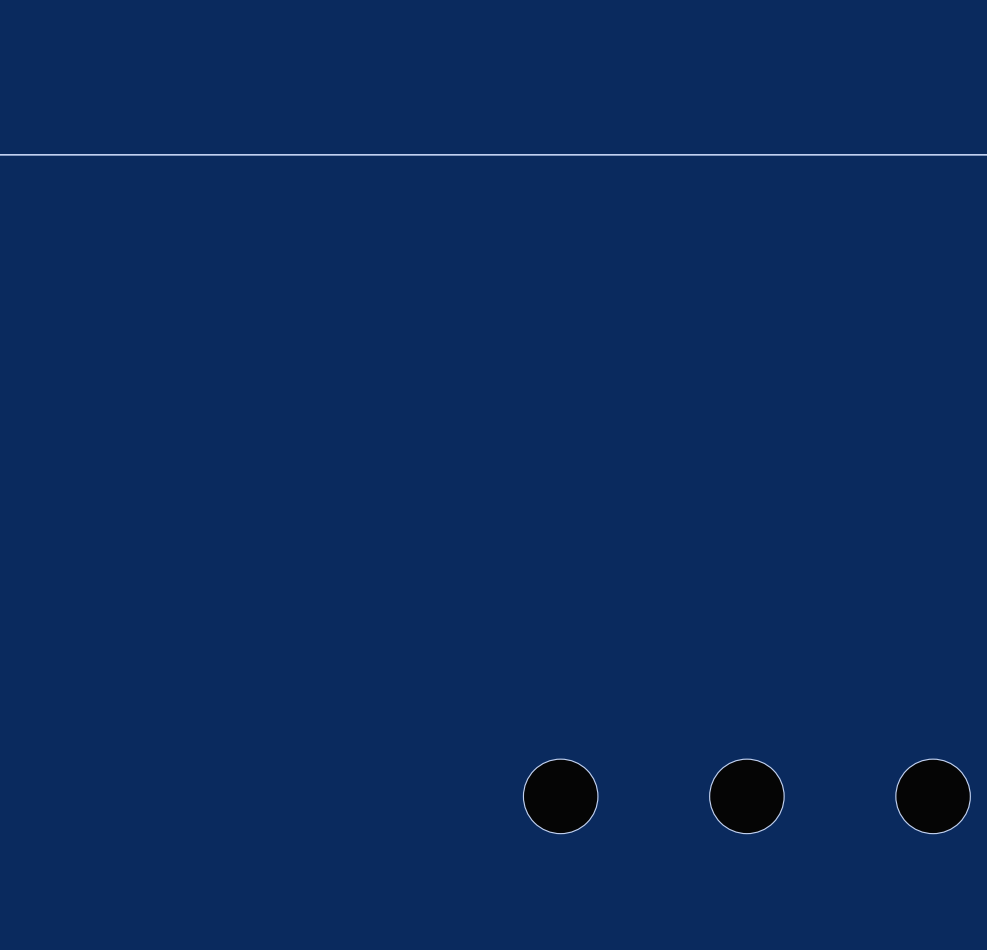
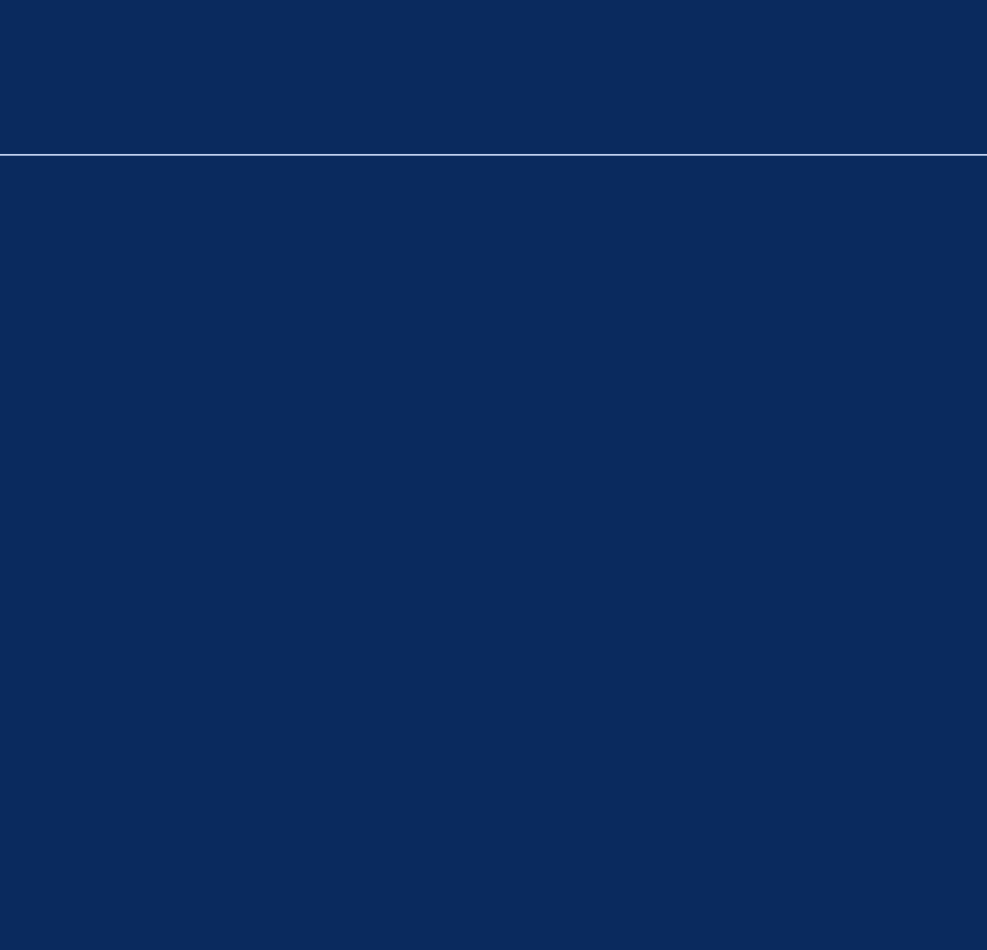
part: (560, 796) -> none
part: (746, 796) -> none
part: (933, 796) -> none

